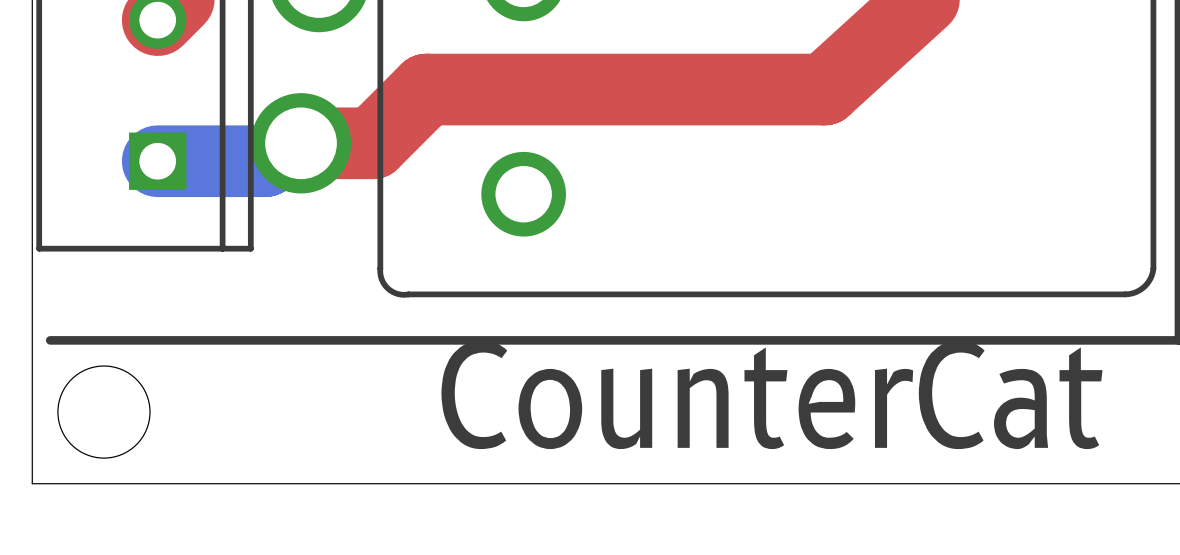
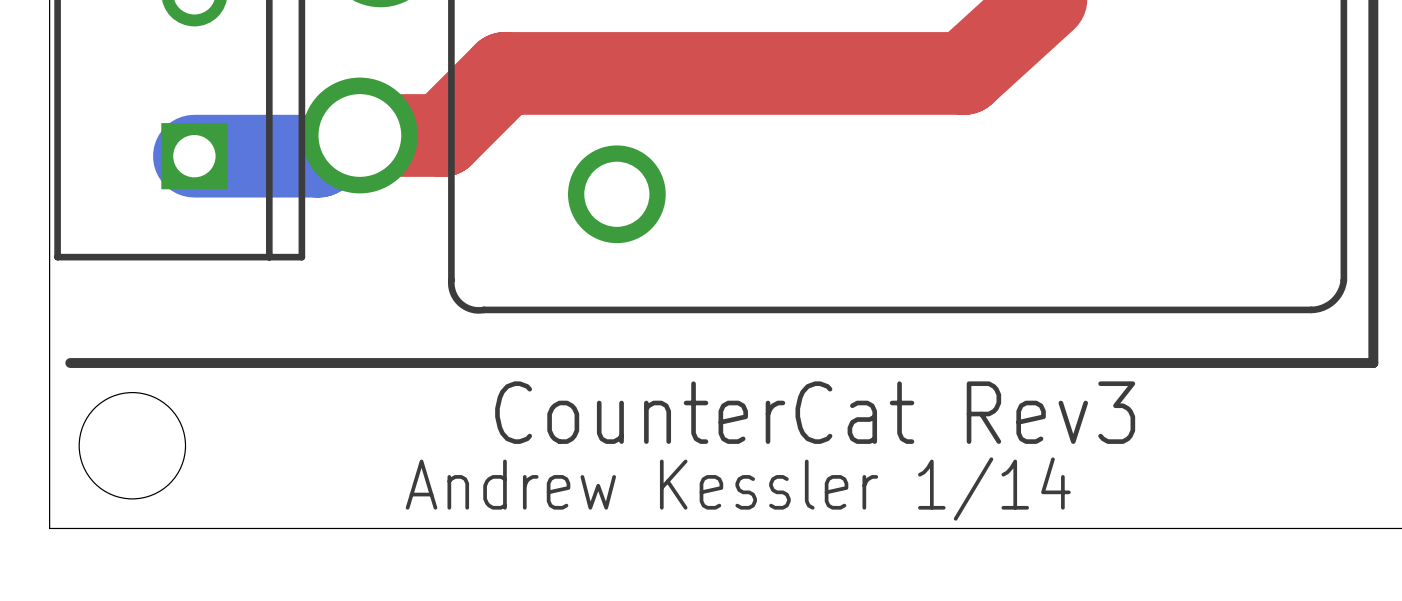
text: CounterCat (771, 394) -> CounterCat Rev3 (815, 412)
text: none -> Andrew Kessler 1/14 (738, 489)

